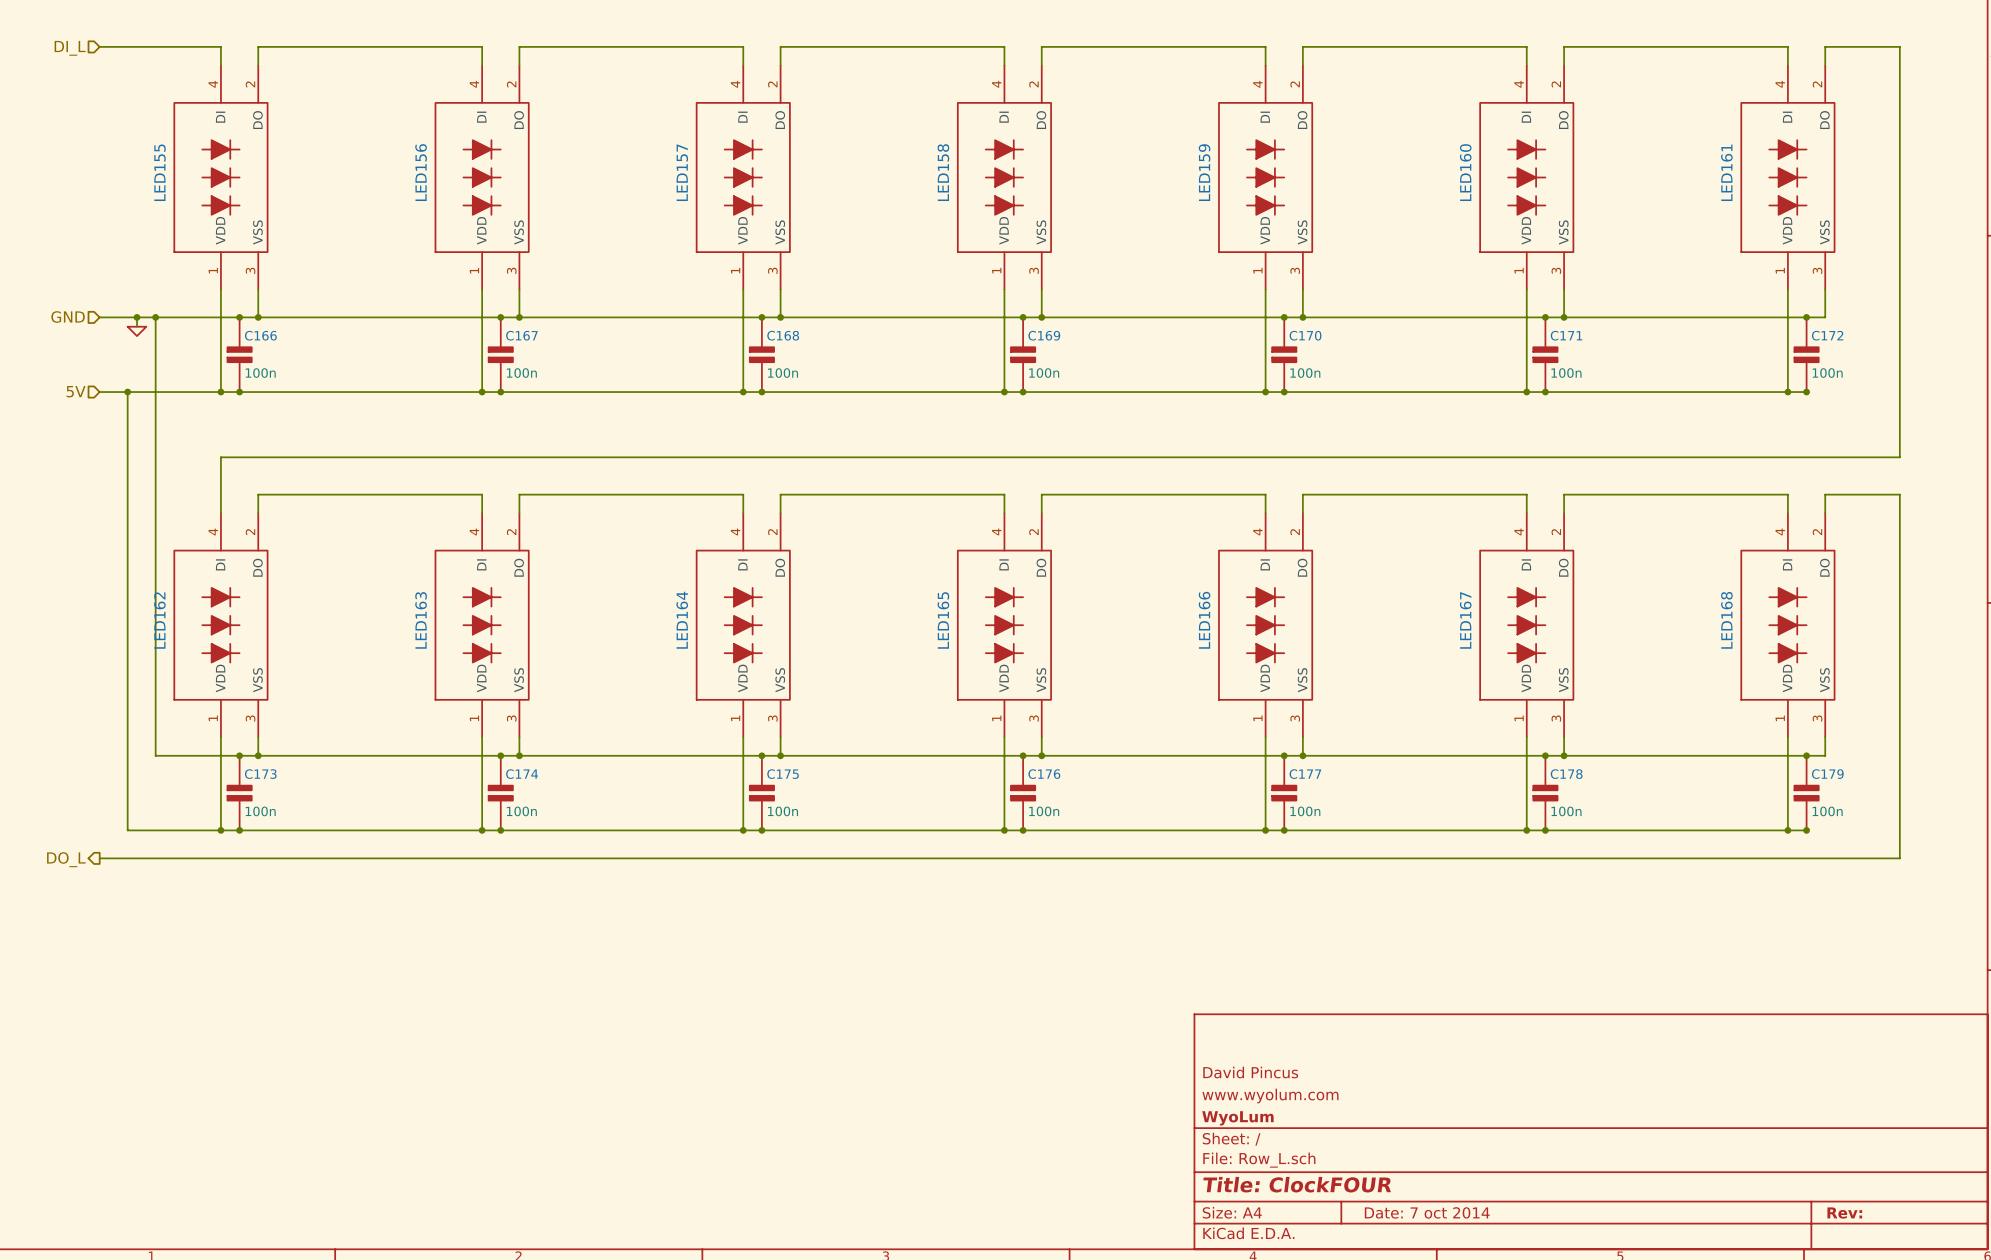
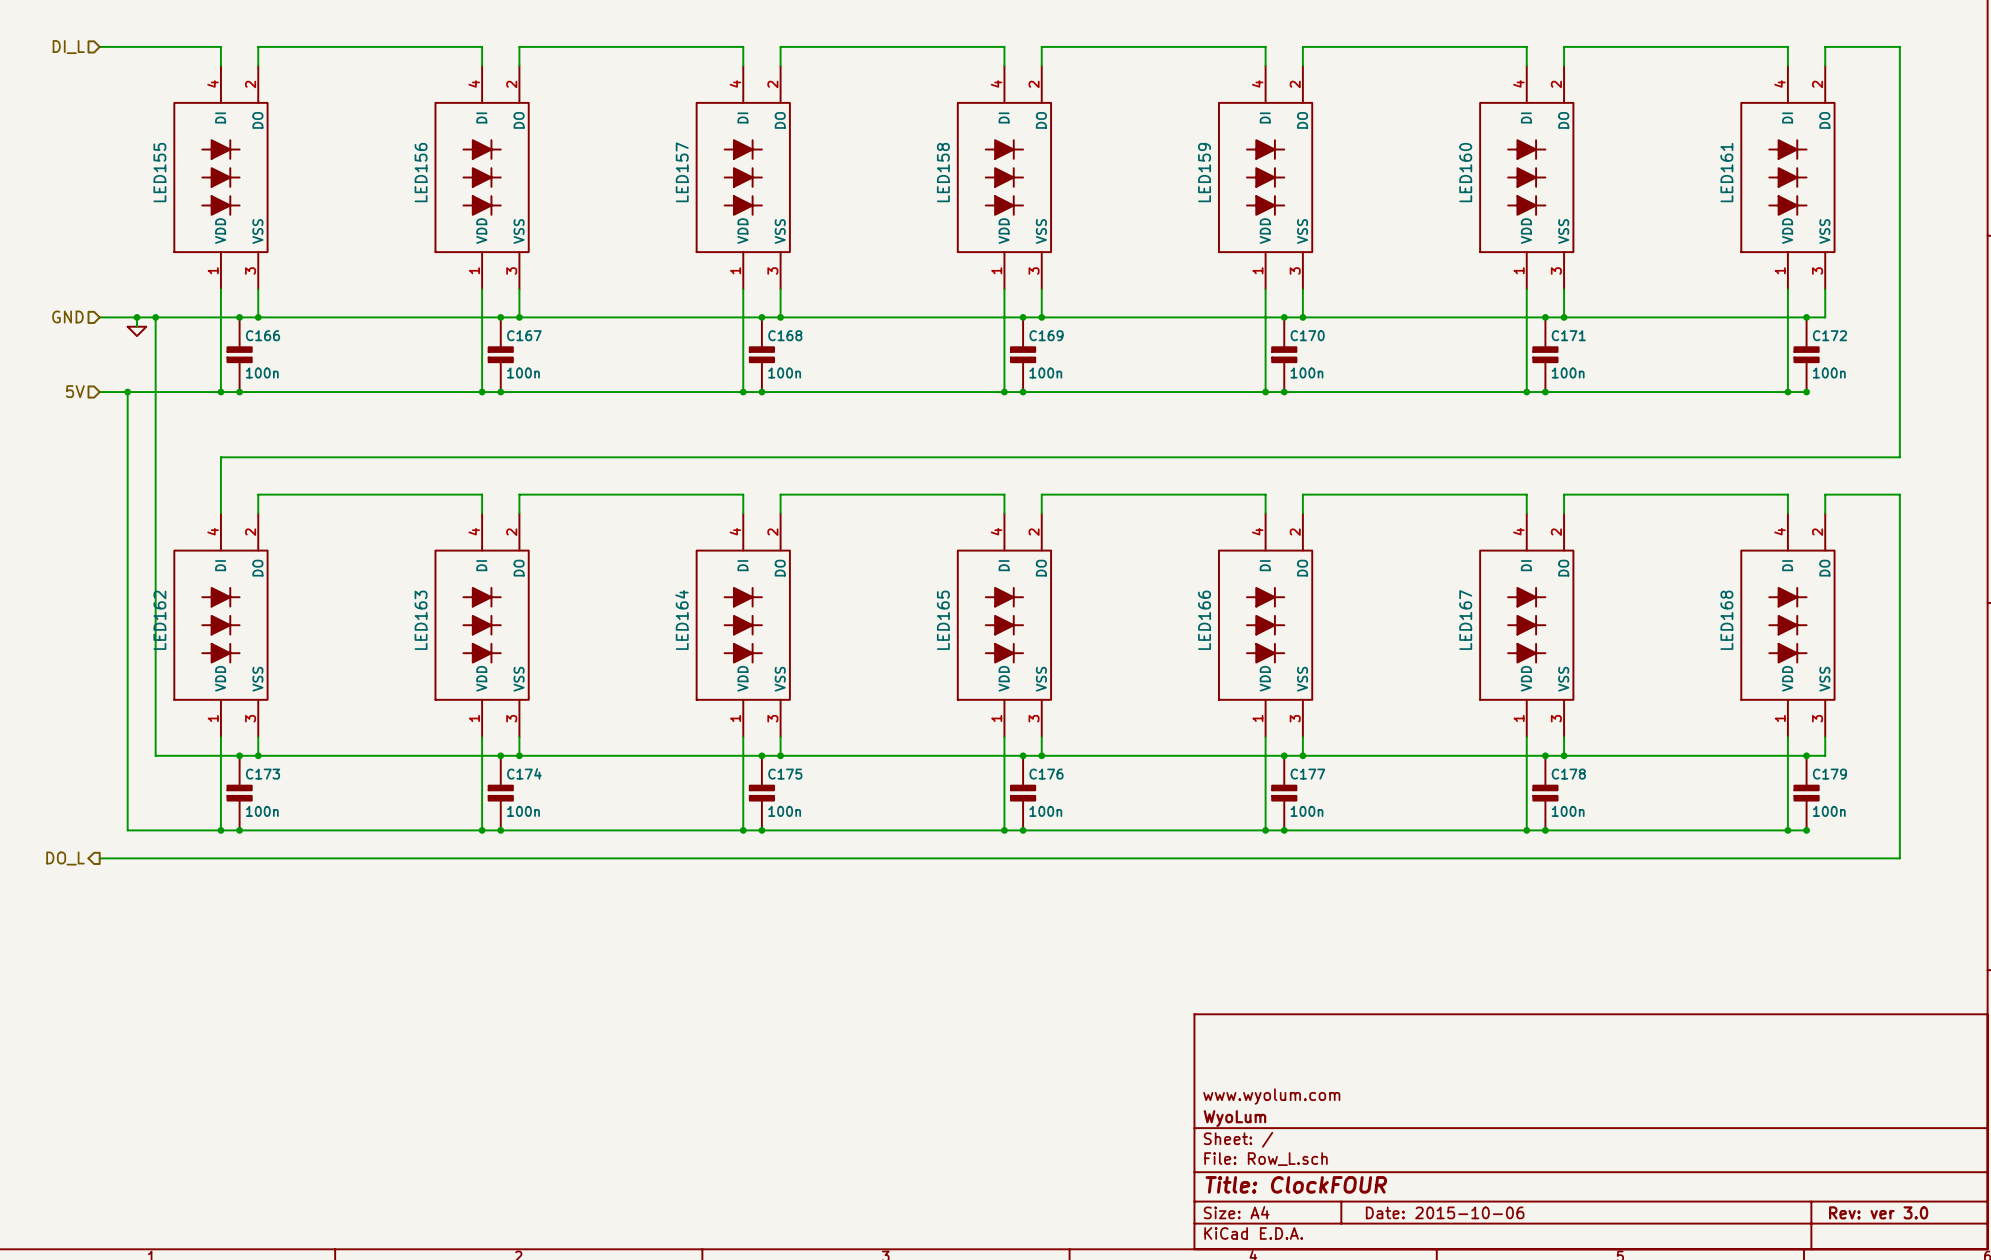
title block: David Pincus (1250, 1072) -> none
title block: Date: 7 oct 2014 (1427, 1212) -> Date: 2015-10-06 (1445, 1212)
title block: Rev: (1844, 1213) -> Rev: ver 3.0 (1878, 1212)

